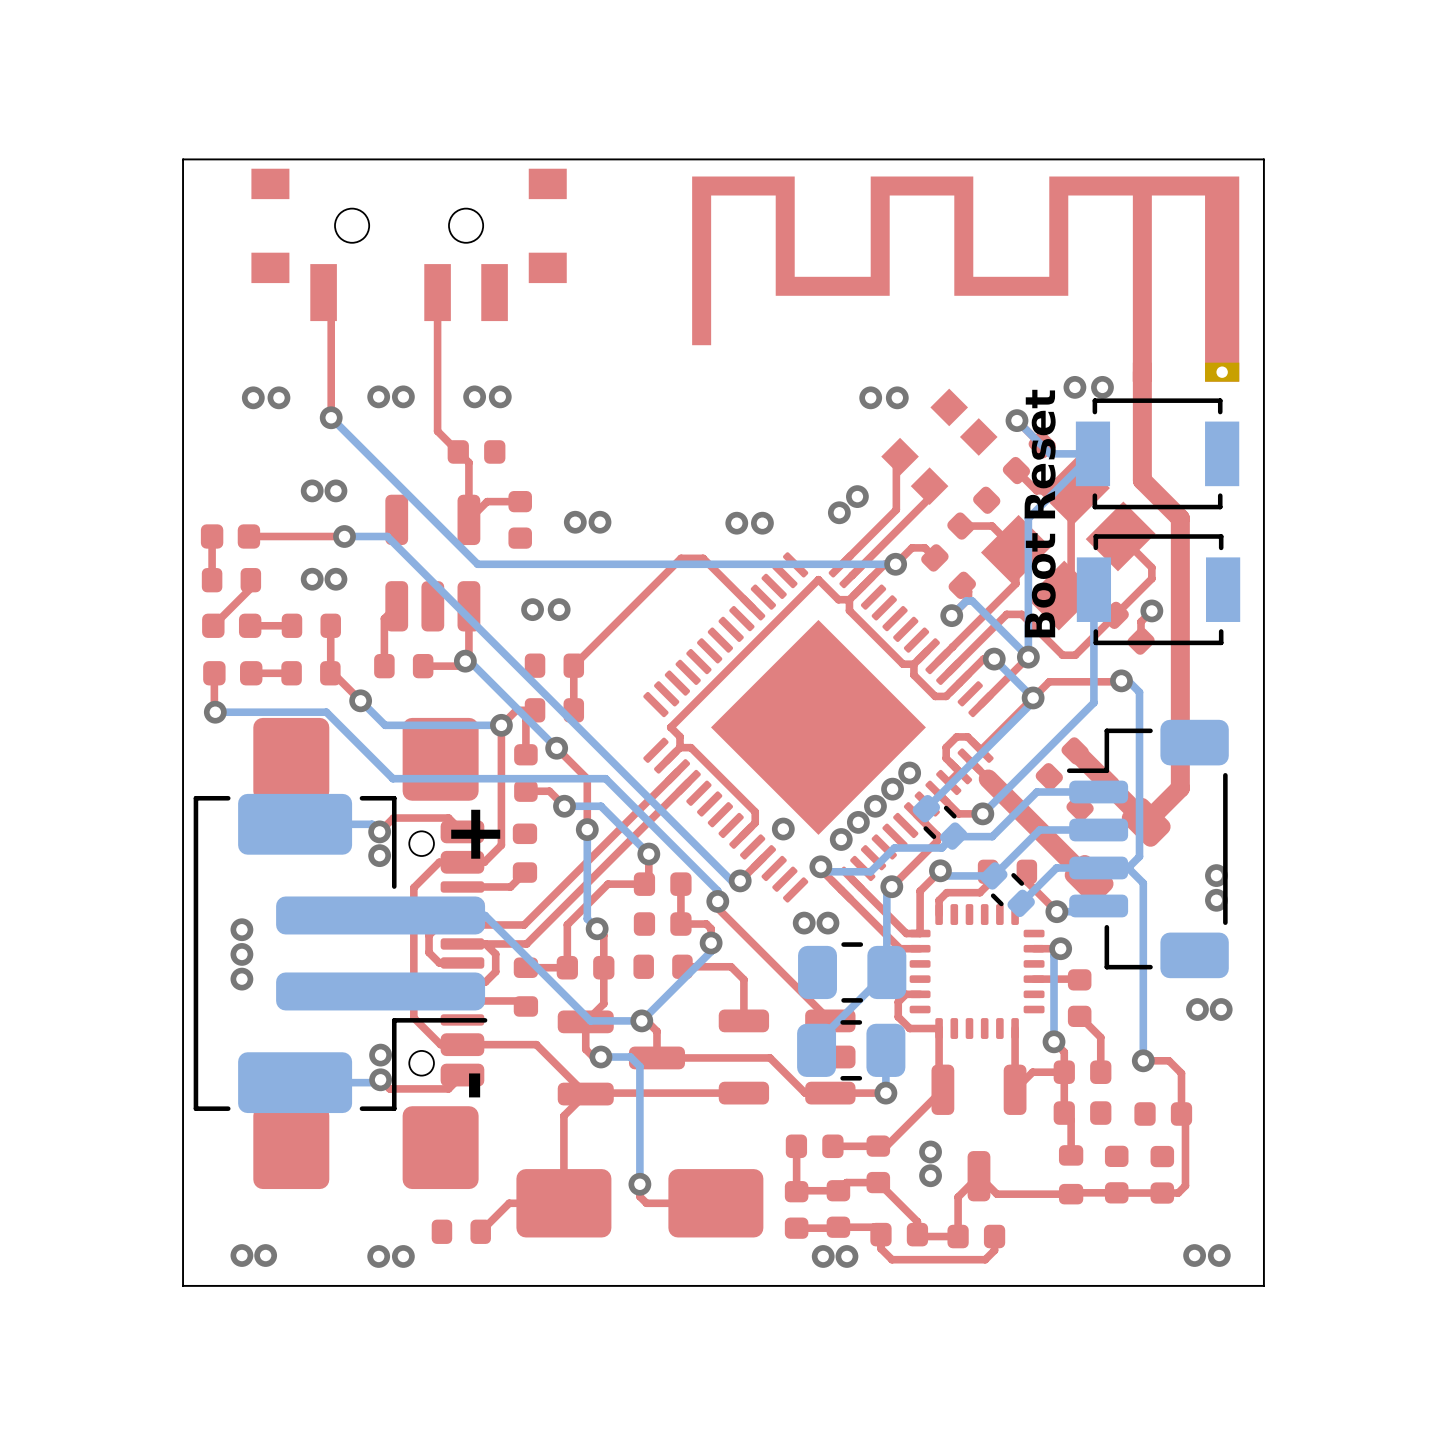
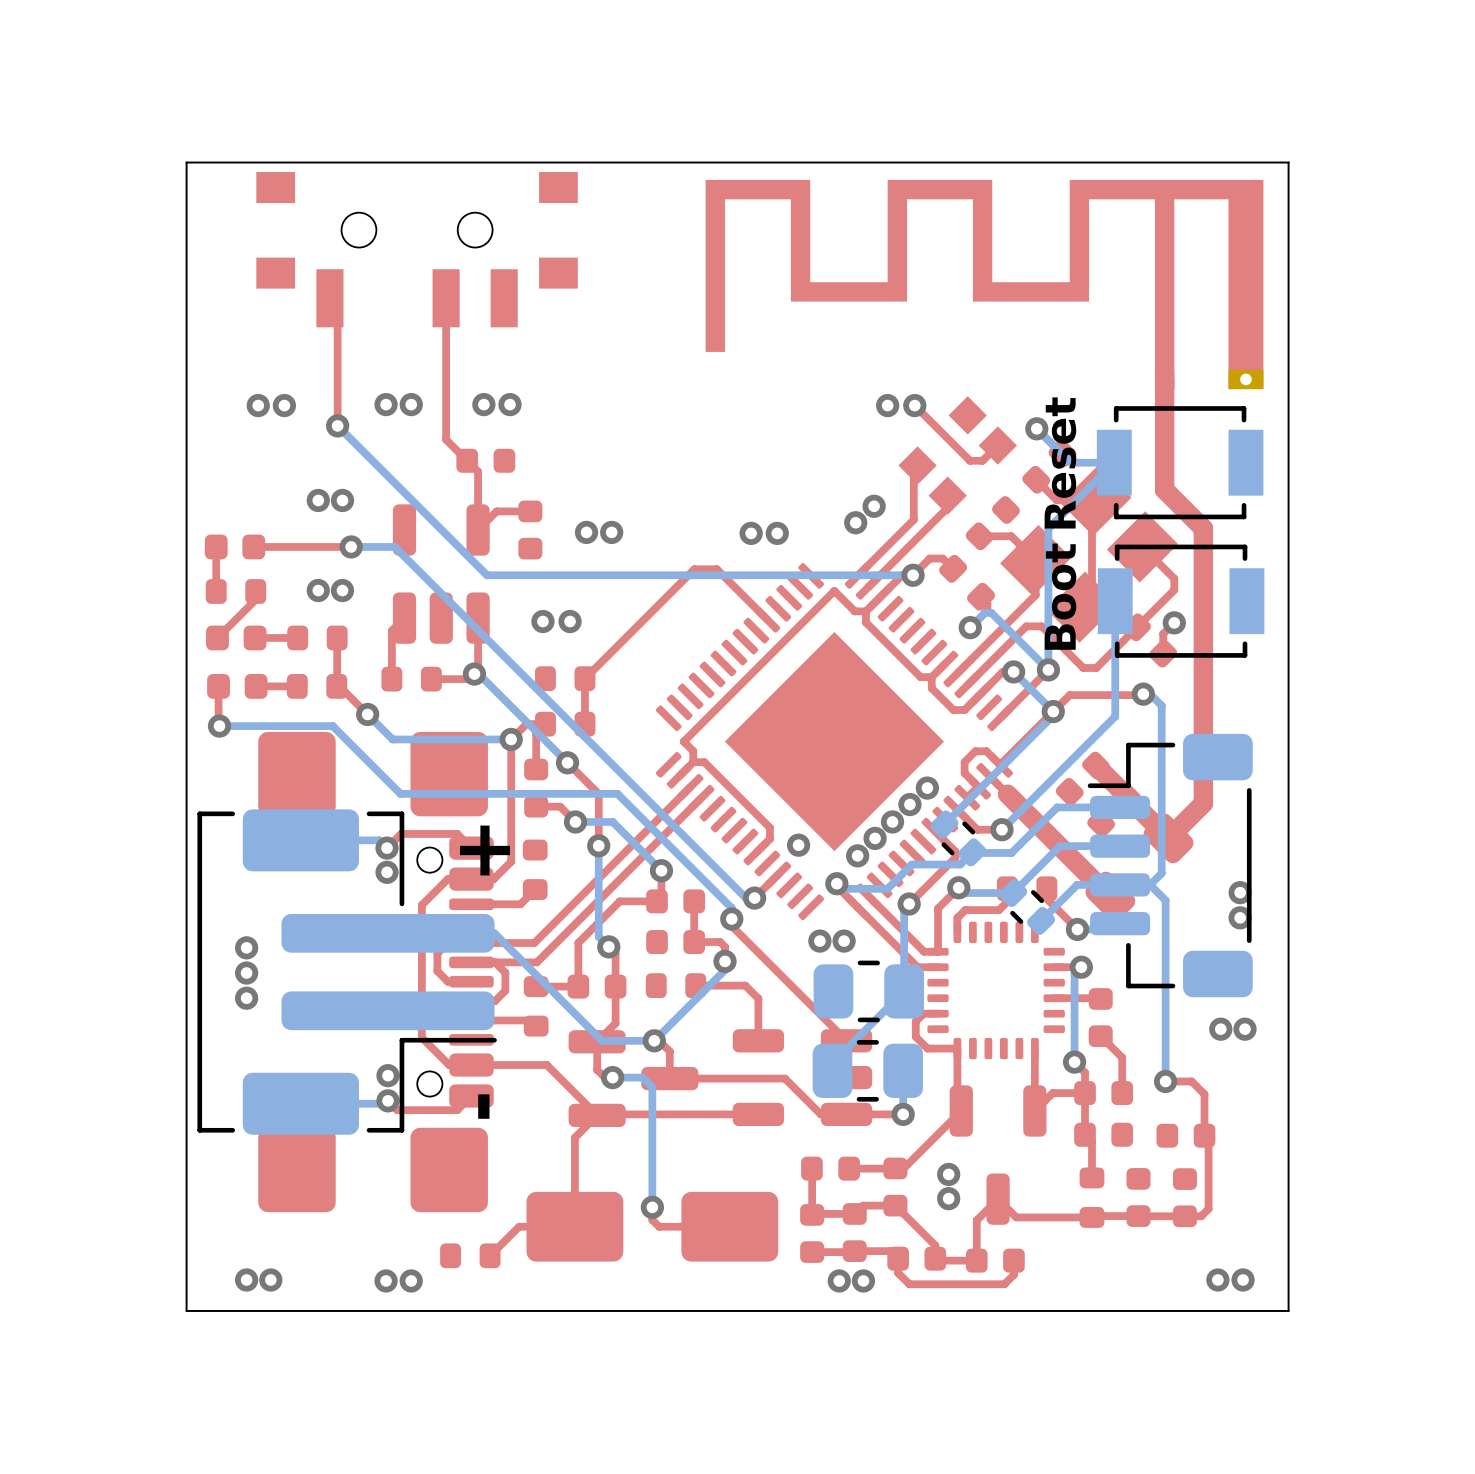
via: (1074, 387) -> none
via: (1102, 387) -> none
top track: none -> (914, 405) (969, 460) (982, 460) (997, 445)

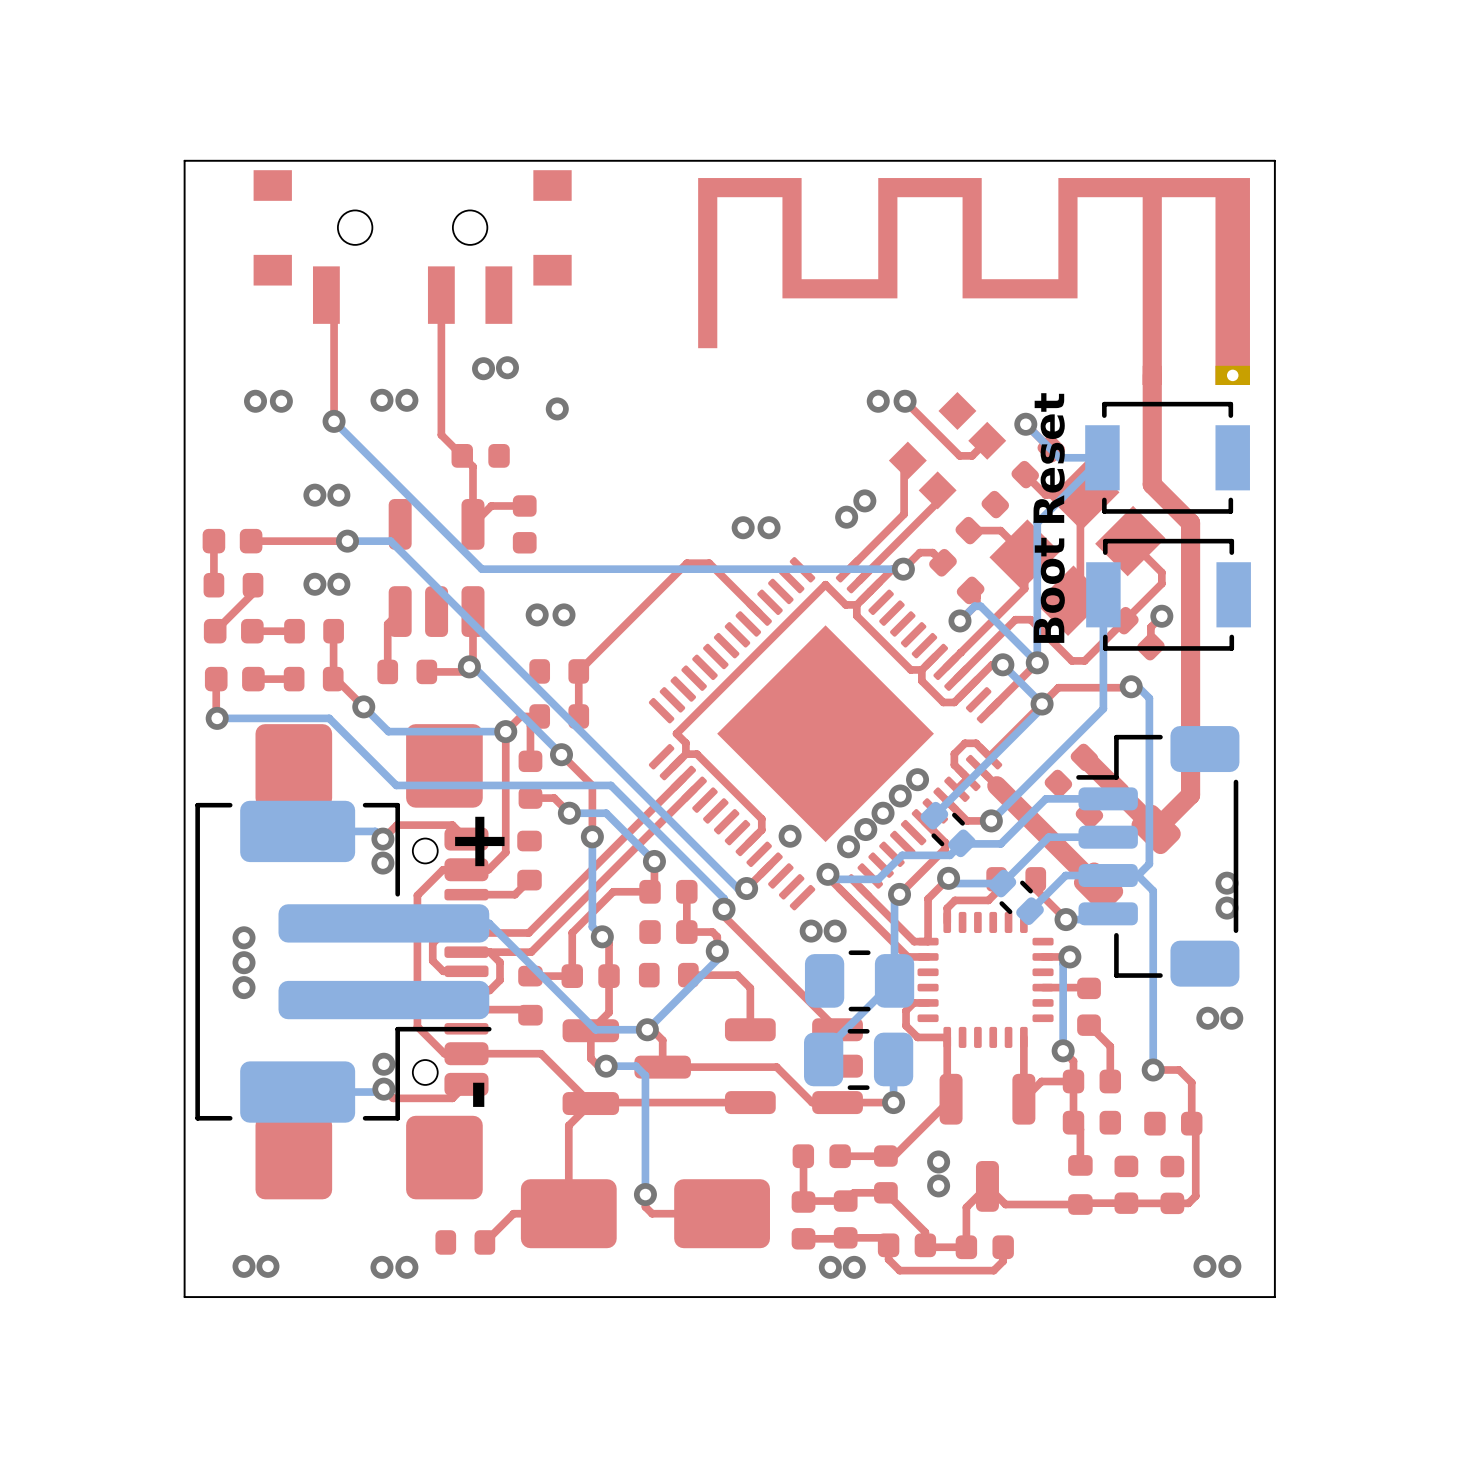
via: none -> (507, 367)
via: none -> (483, 368)
via: (483, 404) -> none
via: (510, 404) -> none
via: none -> (557, 408)
via: (586, 532) -> none
via: (611, 532) -> none

